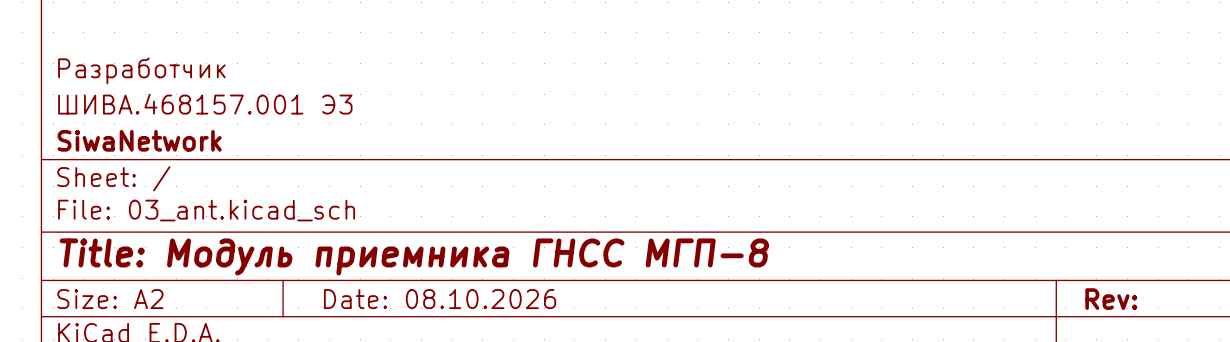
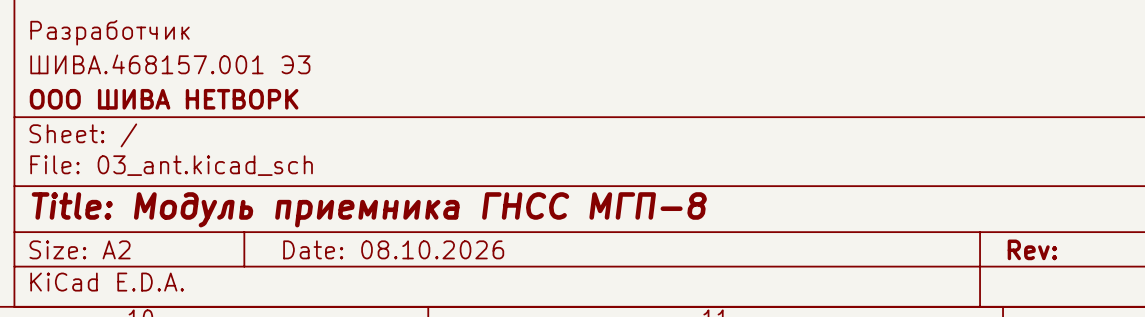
title block: SiwaNetwork (139, 140) -> ООО ШИВА НЕТВОРК (164, 99)

